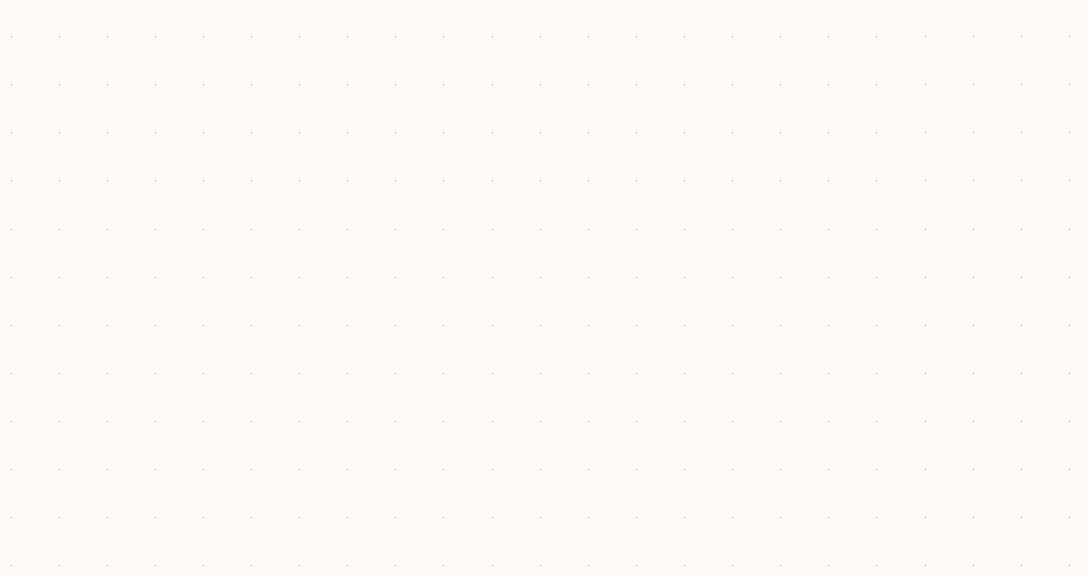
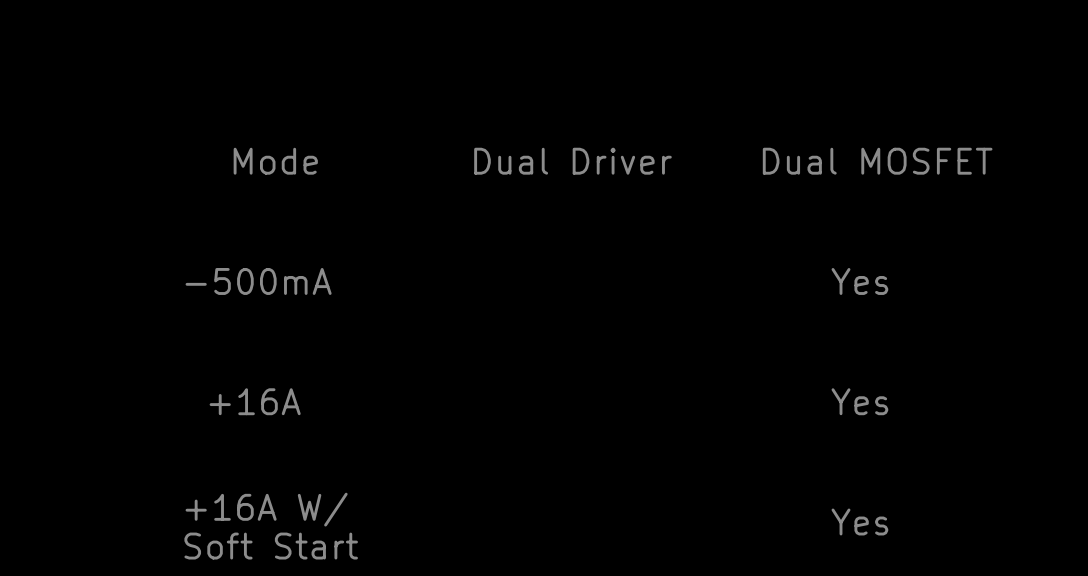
text: none -> Mode (275, 161)
text: none -> Dual Driver (572, 161)
text: none -> Dual MOSFET (877, 161)
text: none -> -500mA (258, 281)
text: none -> Yes (859, 281)
text: none -> +16A (255, 401)
text: none -> Yes (859, 401)
text: none -> +16A W/ (266, 509)
text: none -> Yes (859, 521)
text: none -> Soft Start (271, 546)

